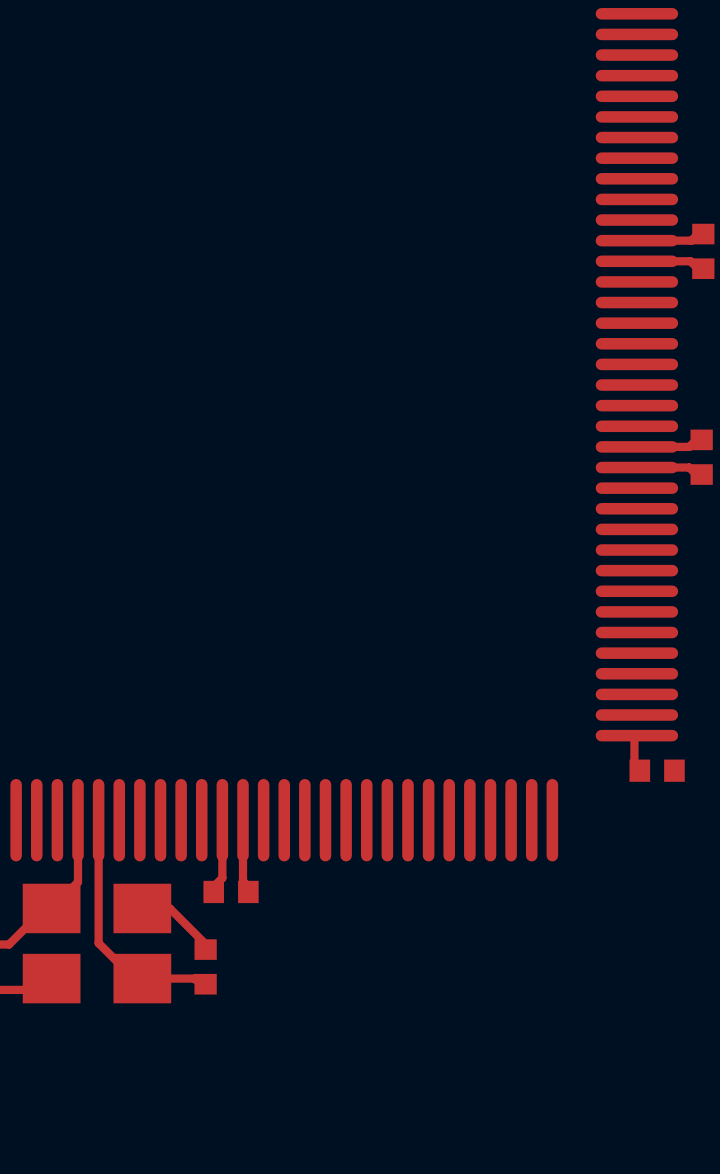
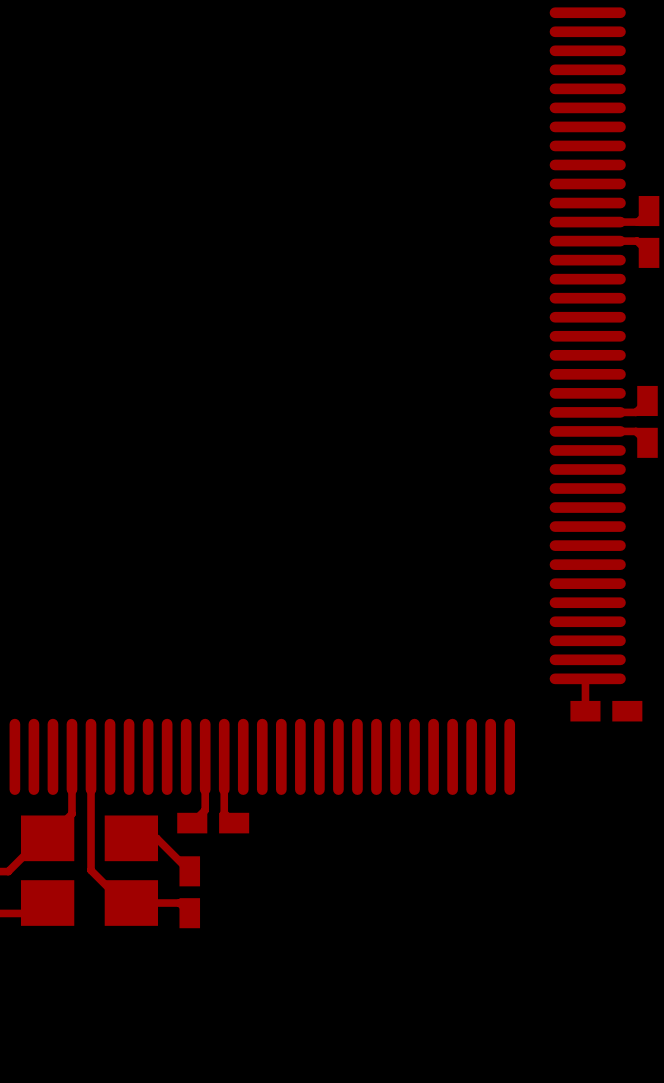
part footprint: [692, 223, 715, 280] -> [638, 196, 660, 268]
part footprint: [690, 429, 713, 485] -> [637, 385, 658, 458]
part footprint: [629, 759, 685, 782] -> [570, 700, 643, 722]
part footprint: [203, 880, 259, 904] -> [177, 812, 250, 834]
part footprint: [194, 939, 217, 995] -> [179, 856, 201, 929]

